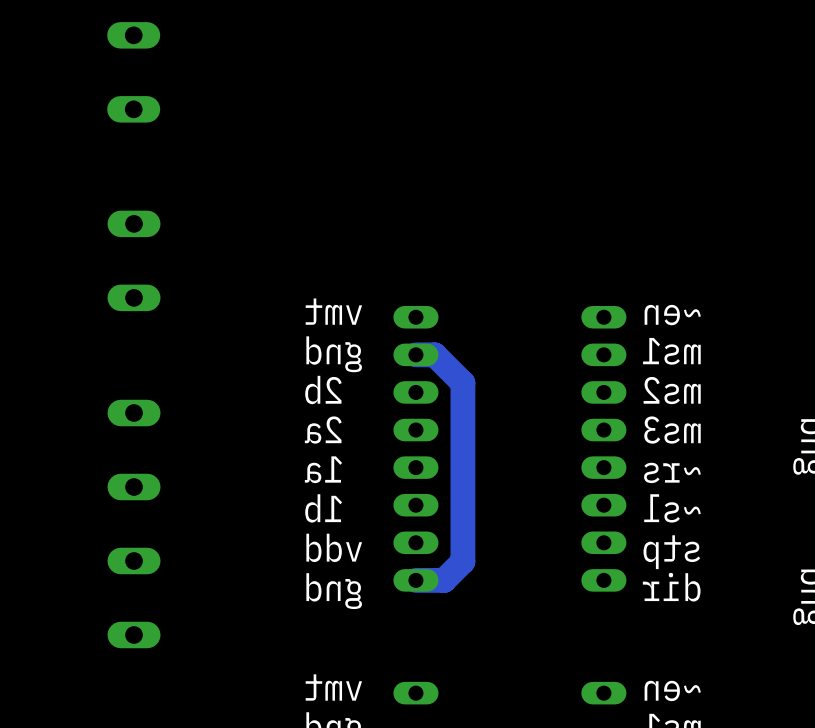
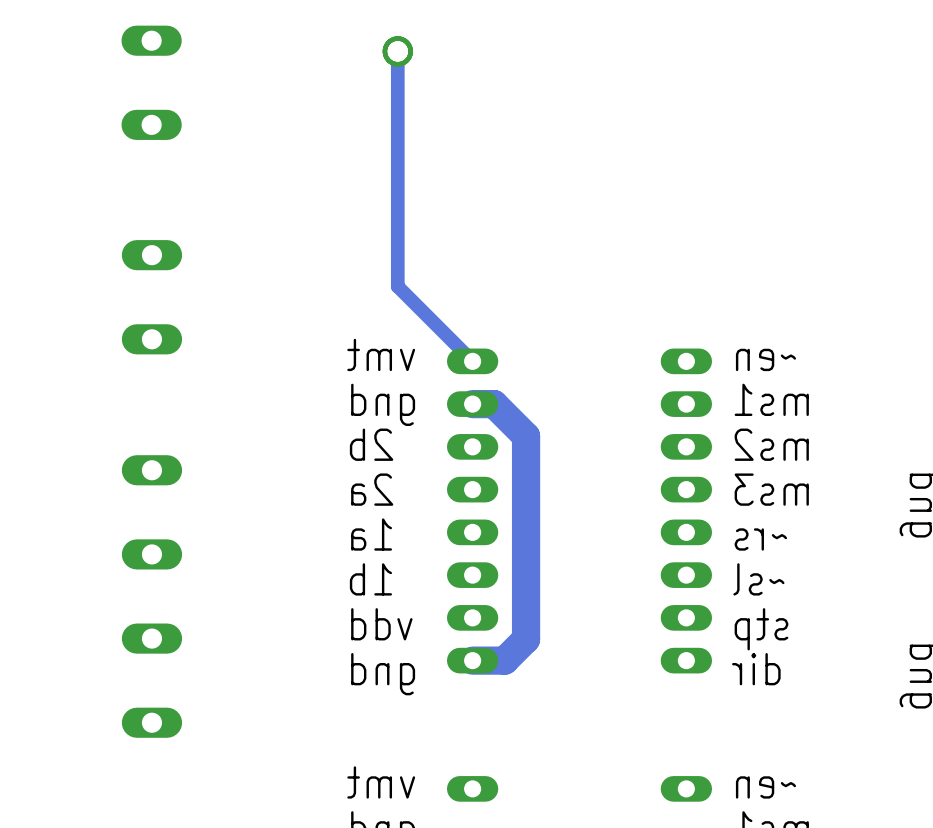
track: none -> (397, 51) (397, 286) (472, 361)
via: none -> (397, 51)

